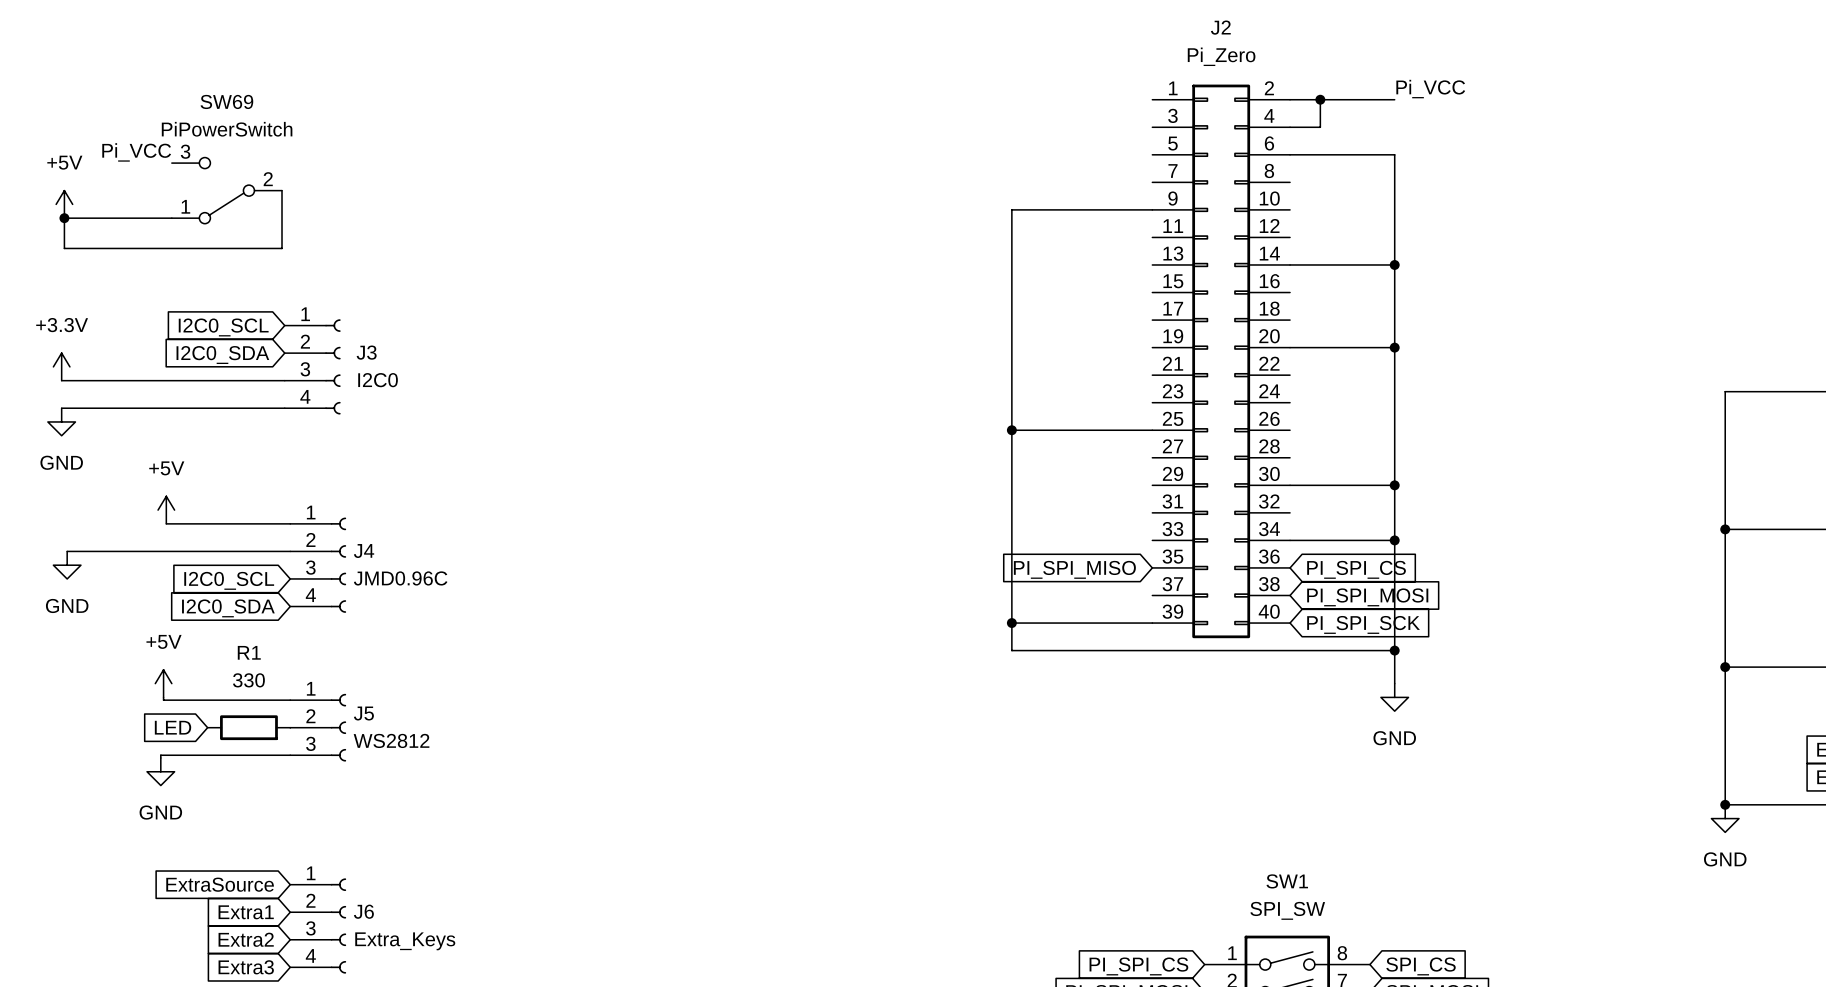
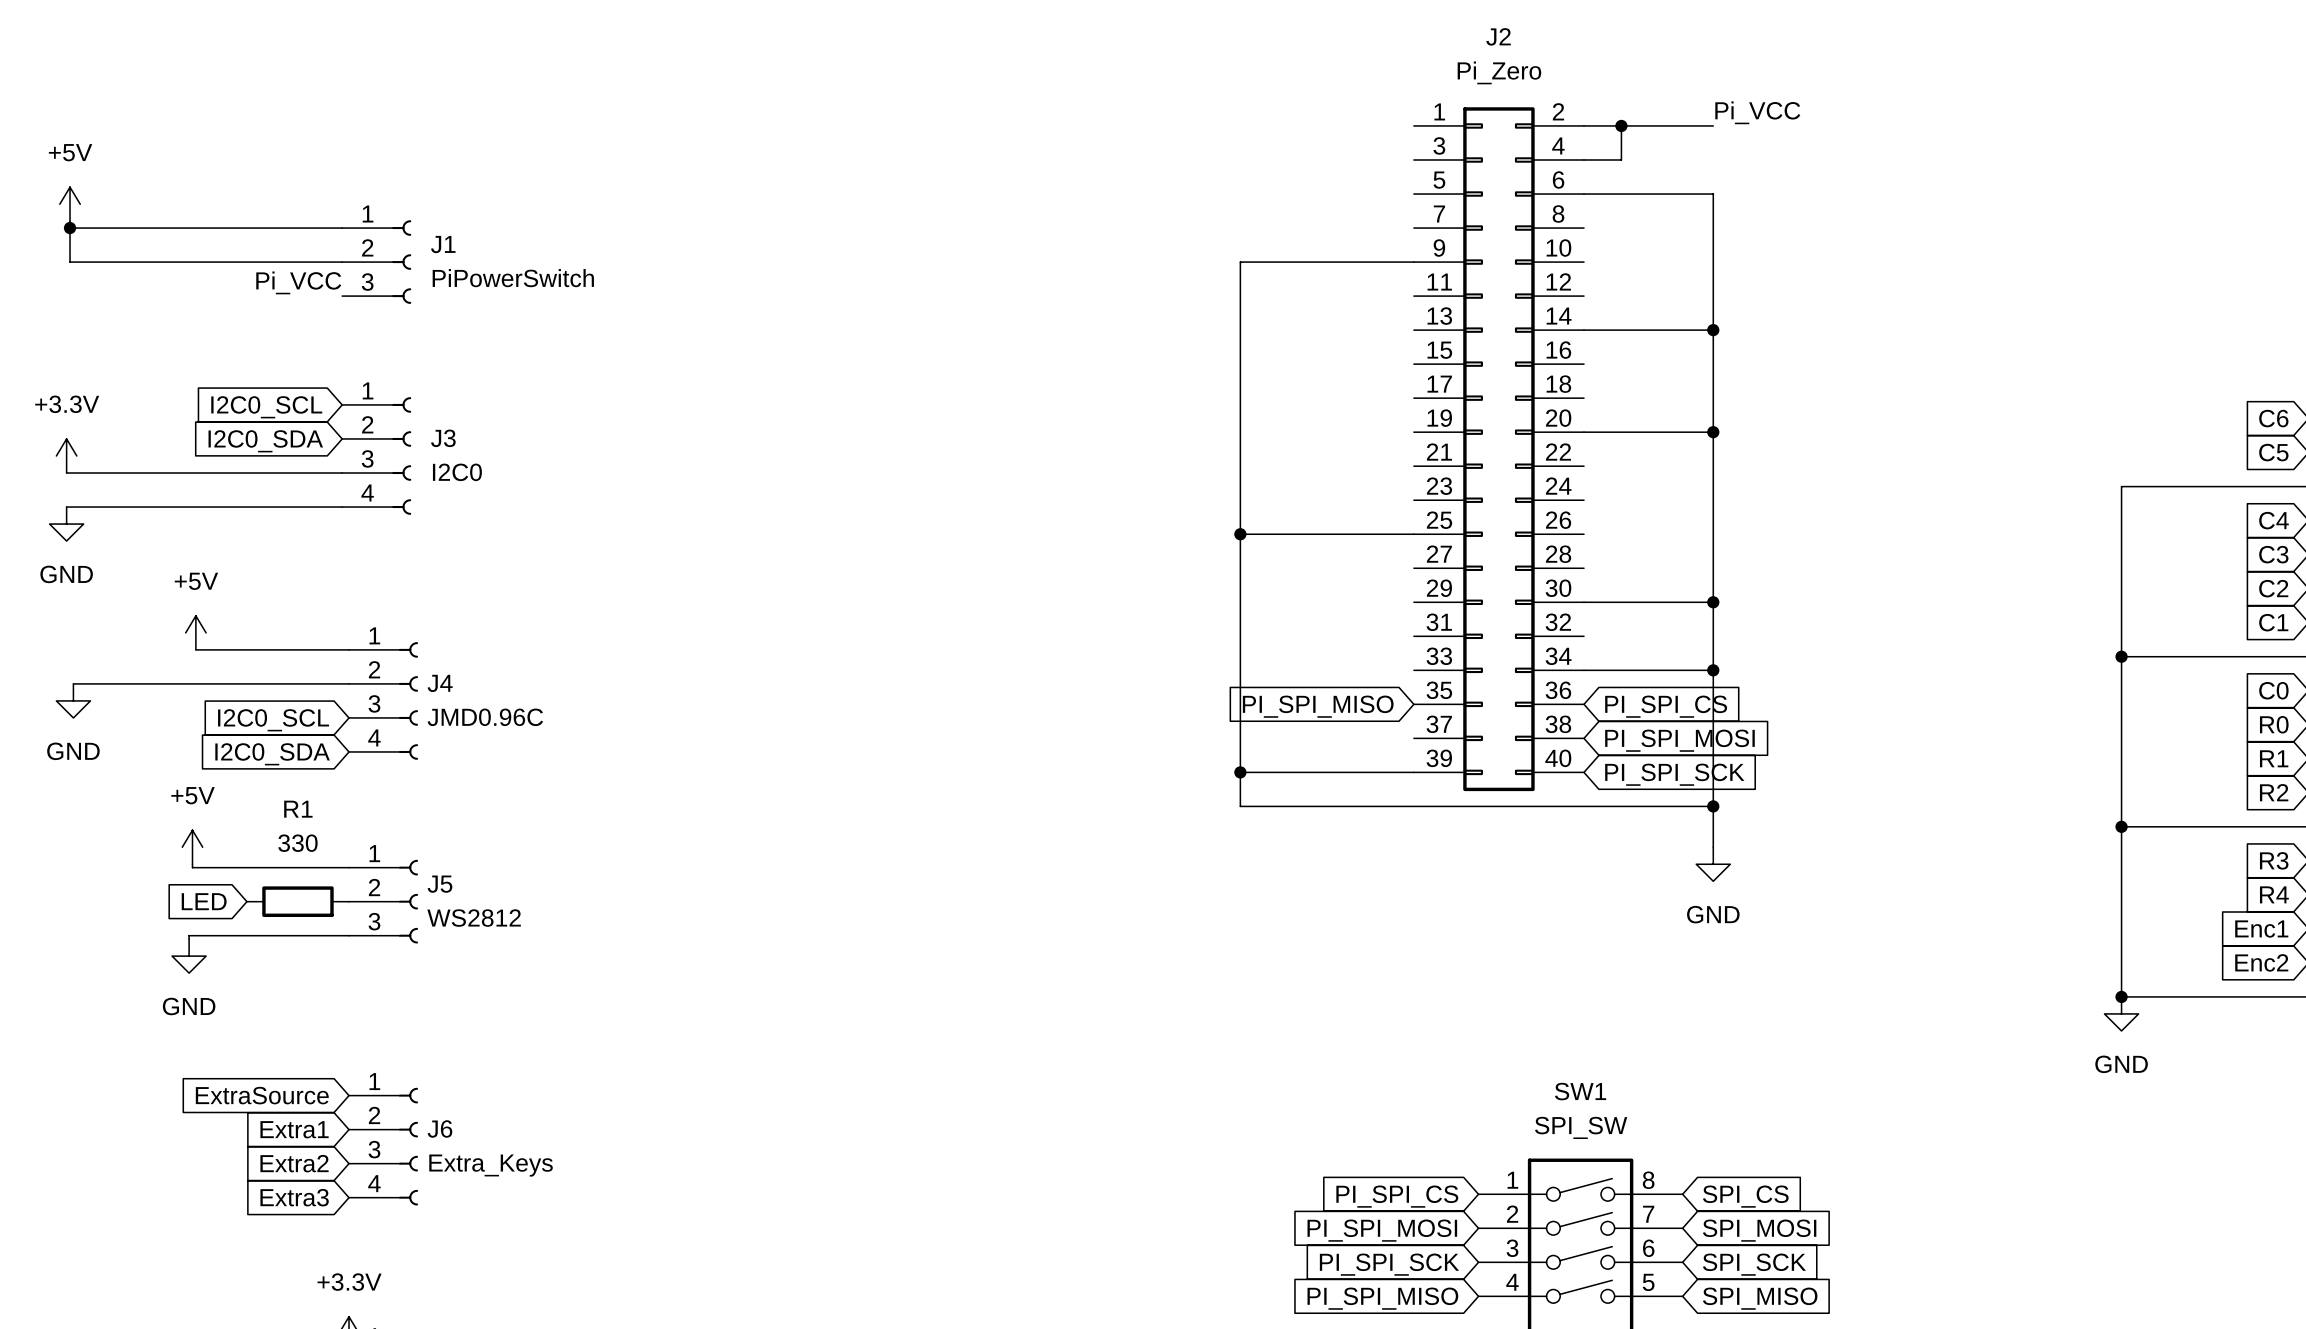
label position: Pi_VCC (136, 152) -> Pi_VCC (298, 282)
wire: none -> (70, 221) (70, 262) (342, 262)
wire: none -> (70, 228) (342, 228)
SW69: PiPowerSwitch (226, 190) -> none
wire: (282, 190) (282, 248) (64, 248) (64, 218) (171, 218) -> none
power symbol position: +5V (64, 204) -> +5V (70, 204)
J1: none -> PiPowerSwitch (376, 262)
junction position: (64, 218) -> (70, 228)

